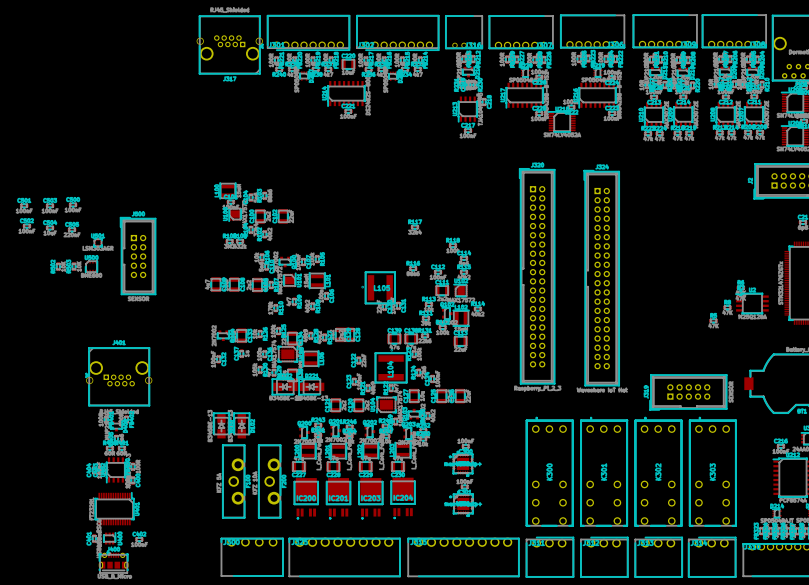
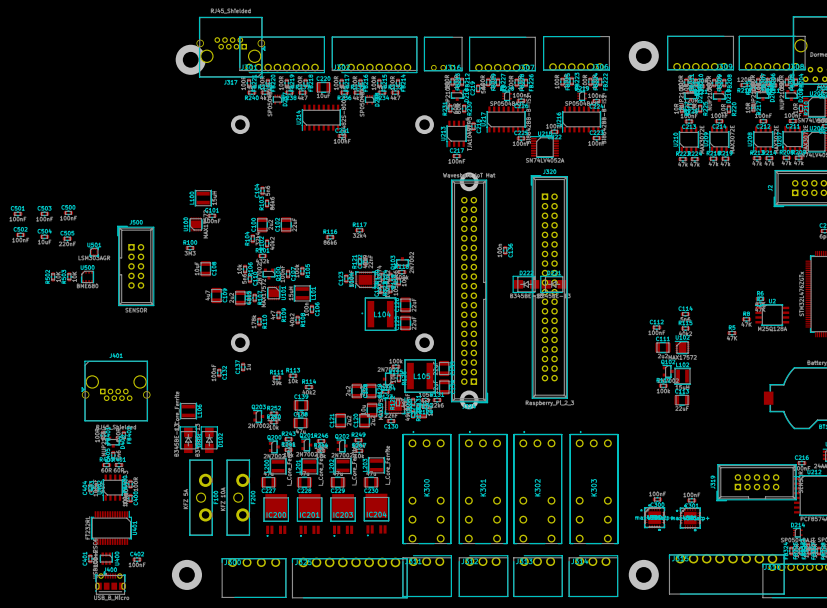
part position: (592, 31) -> (576, 53)
part position: (665, 31) -> (700, 53)
part position: (734, 31) -> (772, 53)
part position: (308, 32) -> (282, 54)
part position: (397, 32) -> (374, 54)
part position: (464, 32) -> (443, 54)
part position: (521, 32) -> (502, 54)
via: none -> (643, 56)
via: none -> (190, 59)
part position: (588, 58) -> (571, 81)
part position: (463, 59) -> (452, 81)
part position: (473, 59) -> (462, 81)
part position: (507, 59) -> (488, 82)
part position: (516, 59) -> (498, 82)
part position: (534, 59) -> (516, 82)
part position: (543, 59) -> (525, 82)
part position: (579, 59) -> (562, 81)
part position: (606, 59) -> (590, 81)
part position: (615, 59) -> (600, 81)
part position: (651, 59) -> (686, 82)
part position: (660, 59) -> (695, 82)
part position: (720, 59) -> (758, 82)
part position: (730, 59) -> (767, 81)
part position: (748, 59) -> (786, 82)
part position: (757, 59) -> (795, 82)
part position: (276, 60) -> (248, 83)
part position: (294, 60) -> (267, 83)
part position: (312, 60) -> (286, 83)
part position: (331, 60) -> (305, 83)
part position: (365, 60) -> (341, 83)
part position: (384, 60) -> (360, 83)
part position: (402, 60) -> (379, 83)
part position: (420, 60) -> (397, 83)
part position: (678, 60) -> (714, 82)
part position: (688, 60) -> (724, 83)
part position: (348, 64) -> (323, 87)
part position: (279, 69) -> (251, 92)
part position: (292, 69) -> (265, 92)
part position: (315, 69) -> (289, 92)
part position: (328, 69) -> (302, 92)
part position: (368, 69) -> (344, 92)
part position: (381, 69) -> (357, 92)
part position: (405, 69) -> (382, 92)
part position: (417, 69) -> (395, 92)
part position: (725, 71) -> (762, 95)
part position: (468, 72) -> (457, 95)
part position: (525, 72) -> (507, 96)
part position: (598, 72) -> (582, 96)
part position: (655, 72) -> (690, 95)
part position: (683, 72) -> (719, 96)
part position: (752, 72) -> (791, 95)
part position: (304, 76) -> (277, 99)
part position: (393, 76) -> (369, 99)
part position: (539, 77) -> (521, 100)
part position: (611, 77) -> (596, 101)
part position: (655, 82) -> (690, 105)
part position: (461, 84) -> (450, 108)
part position: (475, 84) -> (464, 108)
part position: (664, 84) -> (700, 108)
part position: (716, 84) -> (753, 107)
part position: (762, 84) -> (800, 108)
part position: (647, 85) -> (681, 108)
part position: (692, 85) -> (728, 109)
part position: (346, 93) -> (321, 117)
part position: (524, 95) -> (506, 119)
part position: (597, 95) -> (581, 119)
part position: (754, 96) -> (792, 120)
part position: (654, 97) -> (689, 121)
part position: (683, 97) -> (719, 121)
part position: (725, 97) -> (763, 121)
part position: (484, 102) -> (473, 126)
part position: (571, 107) -> (554, 131)
part position: (467, 109) -> (456, 133)
part position: (348, 111) -> (342, 136)
part position: (539, 113) -> (521, 138)
part position: (612, 113) -> (596, 138)
part position: (683, 114) -> (719, 139)
part position: (725, 114) -> (763, 139)
part position: (754, 114) -> (792, 139)
part position: (654, 115) -> (688, 139)
via: none -> (240, 124)
via: none -> (424, 124)
part position: (561, 121) -> (544, 147)
part position: (468, 130) -> (456, 156)
part position: (719, 132) -> (757, 158)
part position: (731, 132) -> (769, 158)
part position: (748, 132) -> (786, 157)
part position: (760, 132) -> (798, 157)
part position: (648, 133) -> (682, 159)
part position: (659, 133) -> (694, 159)
part position: (677, 133) -> (713, 158)
part position: (689, 133) -> (725, 158)
via: none -> (469, 181)
part position: (227, 190) -> (203, 198)
part position: (250, 197) -> (262, 190)
part position: (230, 202) -> (212, 215)
part position: (235, 214) -> (195, 224)
part position: (414, 227) -> (359, 230)
part position: (229, 241) -> (190, 248)
part position: (240, 241) -> (262, 255)
part position: (452, 245) -> (401, 272)
part position: (262, 257) -> (245, 269)
part position: (463, 258) -> (685, 314)
part position: (317, 259) -> (302, 271)
part position: (285, 262) -> (268, 274)
part position: (303, 262) -> (288, 274)
part position: (266, 266) -> (249, 278)
part position: (413, 268) -> (330, 237)
part position: (438, 272) -> (656, 327)
part position: (463, 272) -> (685, 328)
part rotation: 0° (601, 278) -> 180° (469, 291)
part position: (601, 278) -> (469, 291)
part position: (289, 280) -> (273, 292)
part position: (317, 280) -> (302, 293)
part position: (234, 284) -> (205, 268)
part position: (257, 285) -> (240, 297)
part position: (271, 285) -> (254, 297)
part position: (378, 287) -> (418, 376)
part position: (442, 290) -> (662, 347)
part position: (460, 290) -> (682, 347)
part position: (326, 296) -> (311, 309)
part position: (294, 301) -> (278, 315)
part position: (428, 304) -> (293, 375)
part position: (398, 305) -> (413, 402)
part position: (312, 306) -> (297, 319)
part rotation: 0° (384, 306) -> 90° clockwise (391, 421)
part position: (384, 306) -> (391, 421)
part position: (275, 308) -> (259, 321)
part position: (477, 309) -> (308, 387)
part position: (447, 313) -> (668, 371)
part position: (426, 318) -> (276, 377)
part position: (461, 318) -> (682, 376)
part position: (442, 327) -> (663, 385)
via: none -> (240, 342)
via: none -> (424, 342)
part rotation: 0° (278, 331) -> 90° clockwise (395, 366)
part position: (278, 331) -> (395, 366)
part position: (260, 334) -> (398, 378)
part position: (340, 334) -> (371, 391)
part position: (349, 334) -> (356, 391)
part rotation: 0° (223, 335) -> 90° clockwise (388, 379)
part position: (223, 335) -> (388, 379)
part position: (241, 335) -> (444, 368)
part position: (310, 335) -> (413, 414)
part position: (425, 335) -> (437, 400)
part rotation: 0° (324, 337) -> 90° clockwise (385, 391)
part position: (324, 337) -> (385, 391)
part position: (292, 338) -> (444, 387)
part position: (394, 338) -> (301, 405)
part position: (411, 338) -> (300, 423)
part position: (460, 341) -> (682, 400)
part position: (264, 354) -> (505, 250)
part position: (287, 354) -> (395, 405)
part position: (414, 354) -> (390, 289)
part position: (310, 358) -> (188, 411)
part position: (358, 360) -> (365, 261)
part rotation: 0° (391, 366) -> 90° counterclockwise (378, 314)
part position: (391, 366) -> (378, 314)
part rotation: 0° (260, 369) -> 90° clockwise (425, 400)
part position: (260, 369) -> (425, 400)
part rotation: 0° (274, 372) -> 90° clockwise (425, 406)
part position: (274, 372) -> (425, 406)
part position: (418, 372) -> (390, 277)
part position: (292, 375) -> (372, 410)
part position: (432, 378) -> (382, 289)
part position: (354, 381) -> (346, 278)
via: none -> (469, 399)
part position: (284, 386) -> (526, 284)
part position: (311, 386) -> (553, 284)
part position: (368, 388) -> (359, 261)
part position: (688, 392) -> (756, 482)
part position: (441, 396) -> (405, 323)
part position: (460, 396) -> (405, 305)
part position: (386, 404) -> (365, 279)
part position: (414, 414) -> (402, 262)
part position: (427, 415) -> (382, 276)
part position: (395, 421) -> (398, 281)
part position: (221, 425) -> (188, 439)
part position: (241, 425) -> (209, 439)
part position: (318, 425) -> (288, 439)
part position: (385, 426) -> (358, 440)
part position: (349, 427) -> (321, 441)
part position: (335, 430) -> (306, 445)
part position: (423, 430) -> (273, 413)
part position: (369, 431) -> (342, 445)
part position: (304, 432) -> (274, 446)
part position: (408, 433) -> (258, 416)
part position: (318, 435) -> (288, 449)
part position: (349, 436) -> (321, 450)
part position: (386, 436) -> (359, 450)
part position: (423, 439) -> (273, 422)
part position: (465, 446) -> (657, 499)
part position: (370, 450) -> (343, 466)
part position: (403, 450) -> (376, 465)
part position: (308, 451) -> (278, 466)
part position: (338, 451) -> (309, 466)
part position: (462, 463) -> (654, 517)
part position: (298, 466) -> (268, 482)
part position: (333, 466) -> (304, 482)
part position: (365, 466) -> (337, 482)
part position: (397, 466) -> (371, 482)
part position: (549, 471) -> (426, 487)
part position: (604, 471) -> (483, 487)
part position: (658, 471) -> (537, 487)
part position: (712, 471) -> (594, 487)
part position: (233, 481) -> (201, 497)
part position: (269, 481) -> (238, 497)
part position: (464, 486) -> (691, 500)
part position: (306, 498) -> (276, 515)
part position: (338, 498) -> (309, 515)
part position: (370, 498) -> (343, 515)
part position: (403, 498) -> (376, 514)
part position: (463, 503) -> (690, 518)
part position: (761, 531) -> (808, 547)
via: none -> (186, 574)
via: none -> (643, 574)
part position: (463, 557) -> (726, 574)
part position: (549, 557) -> (427, 576)
part position: (604, 557) -> (483, 576)
part position: (658, 557) -> (537, 576)
part position: (712, 557) -> (593, 576)

